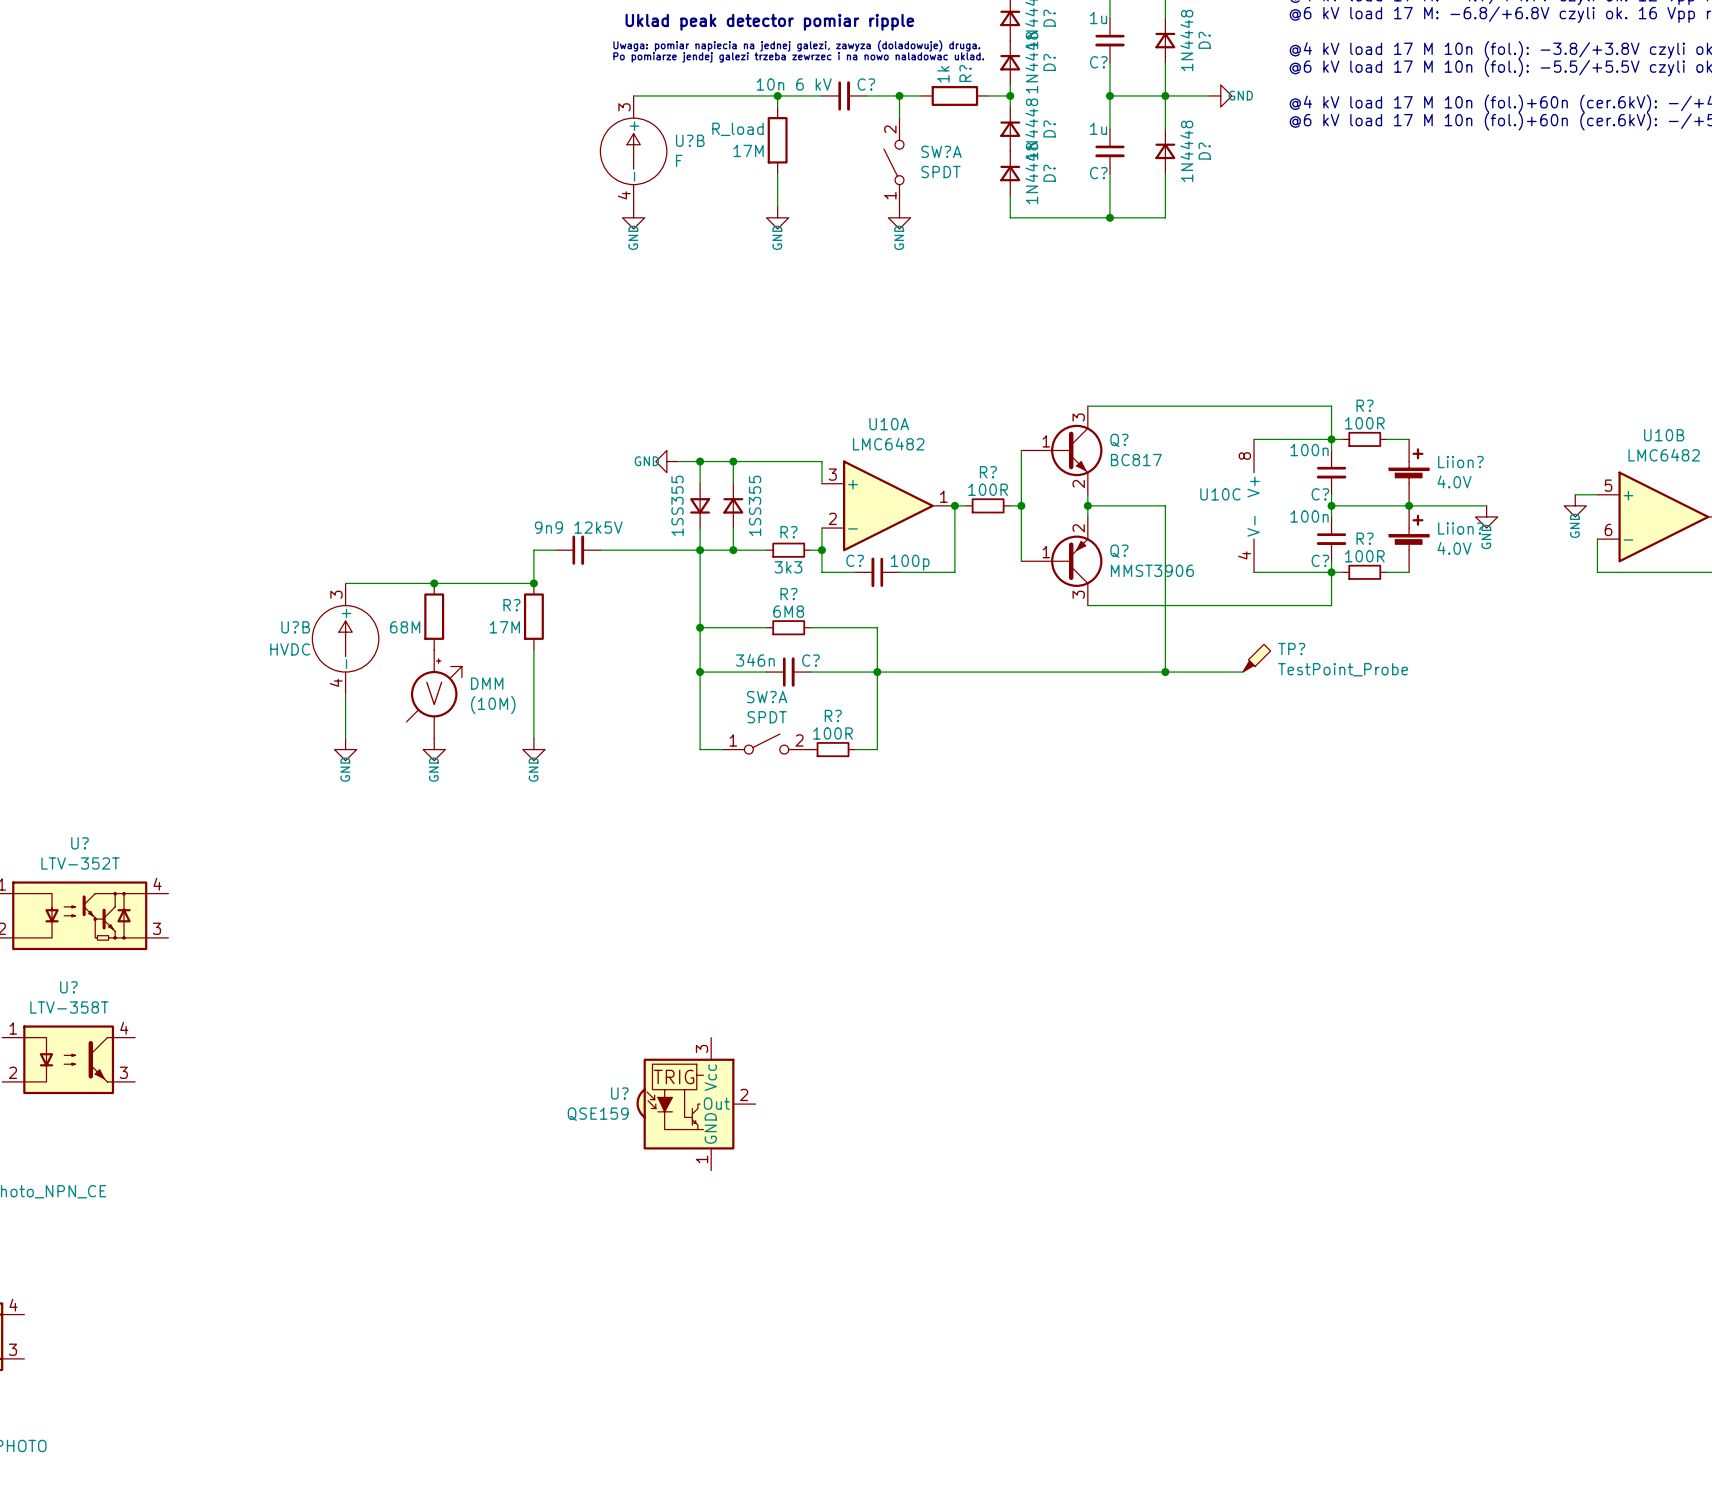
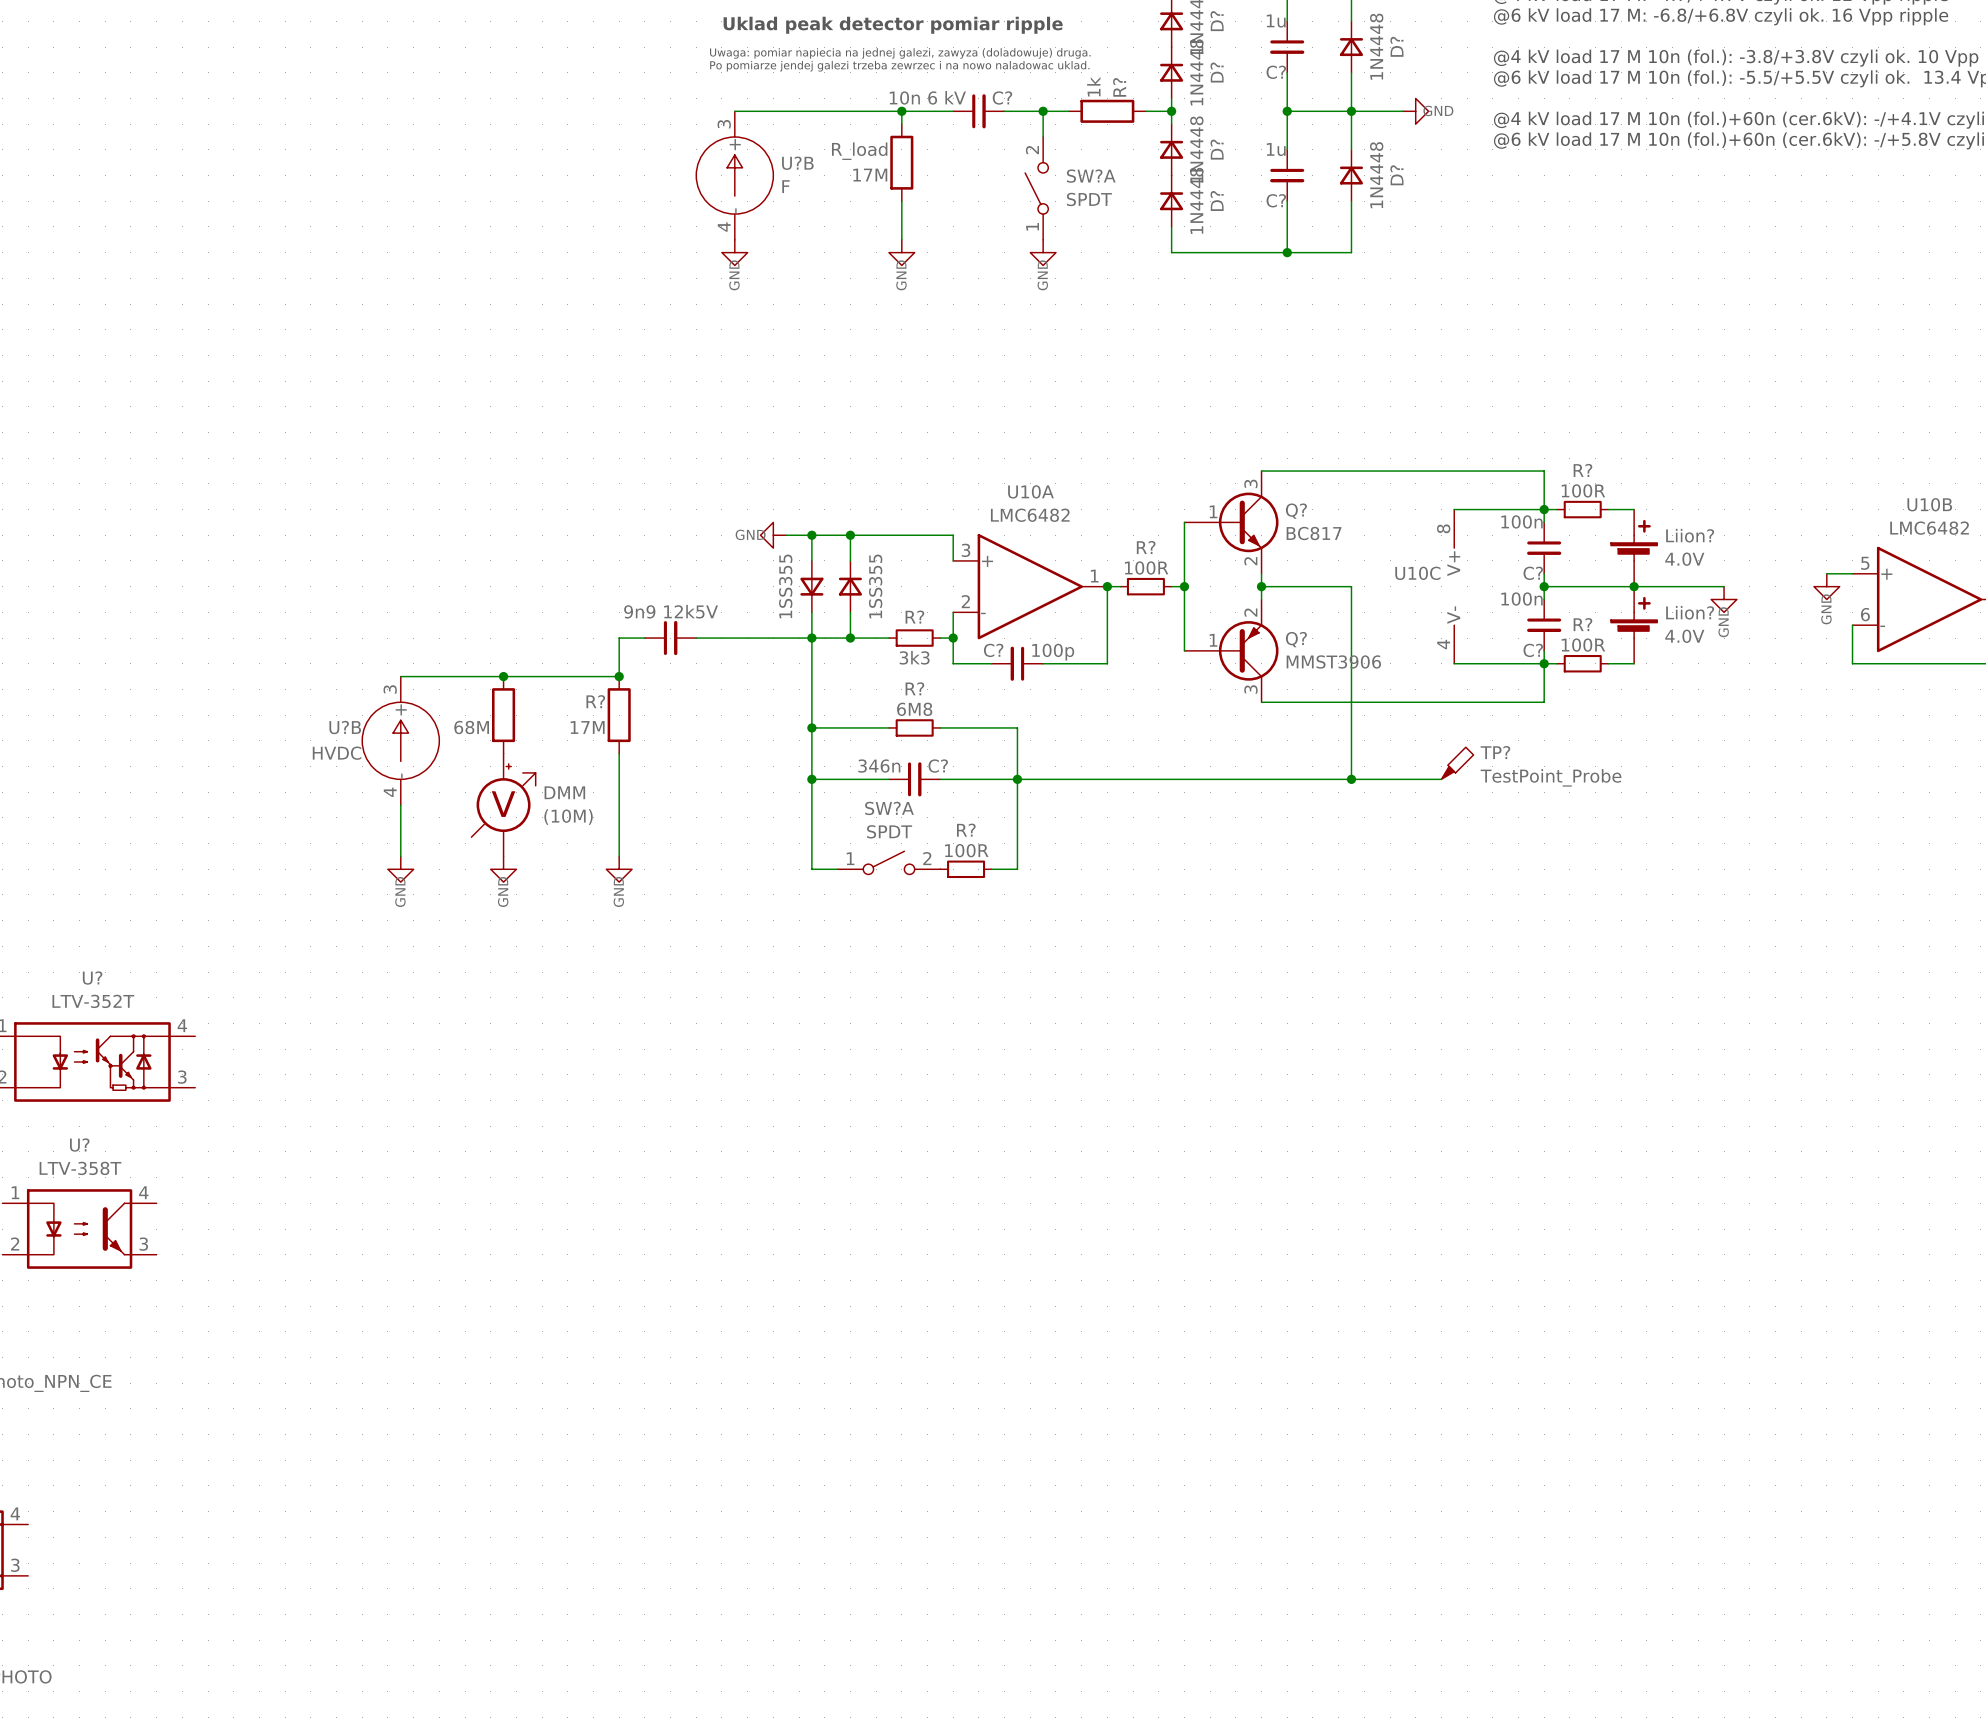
U?: QSE159 (696, 1104) -> none

